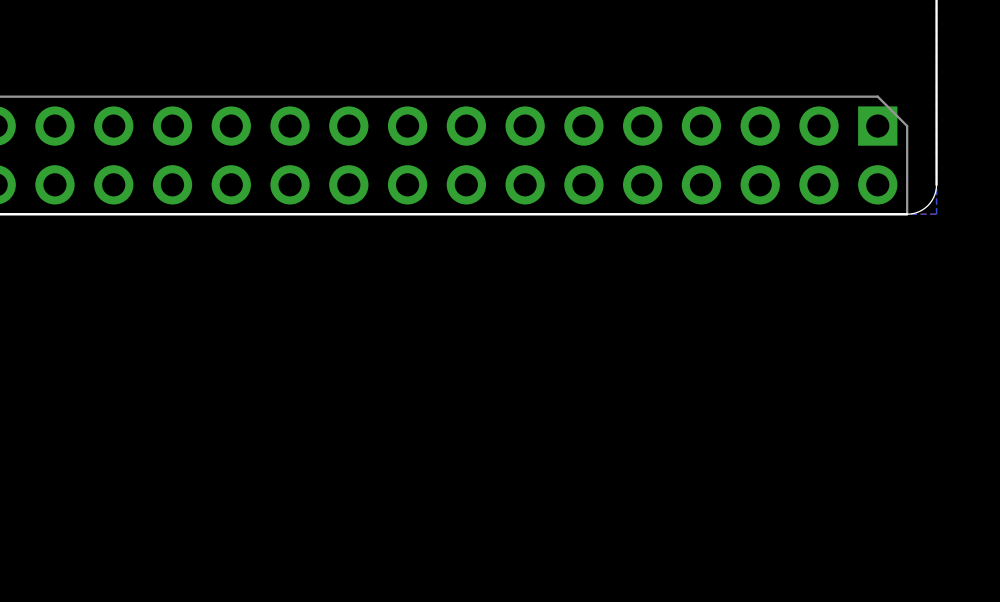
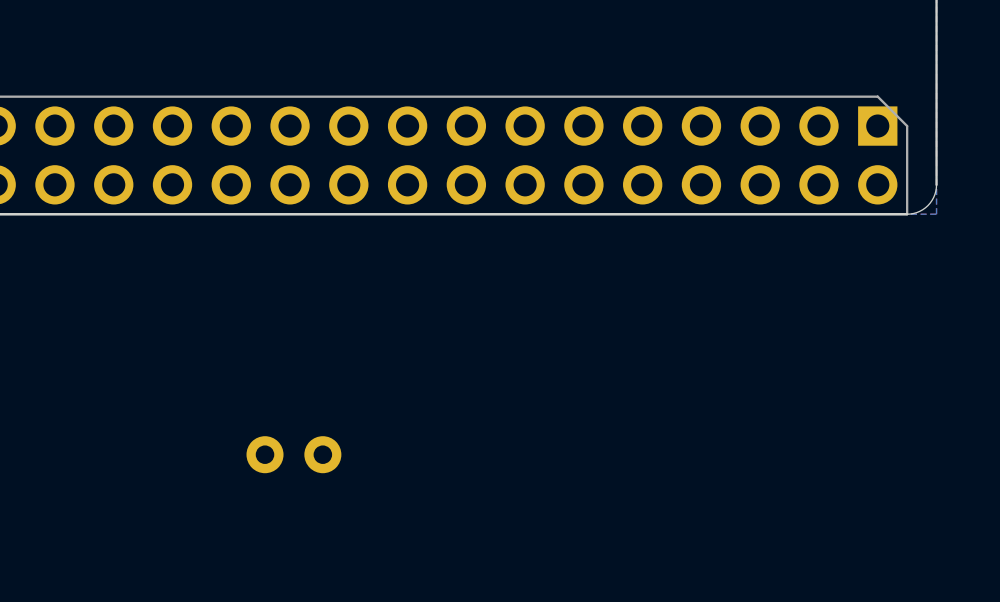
part: none -> (293, 454)

